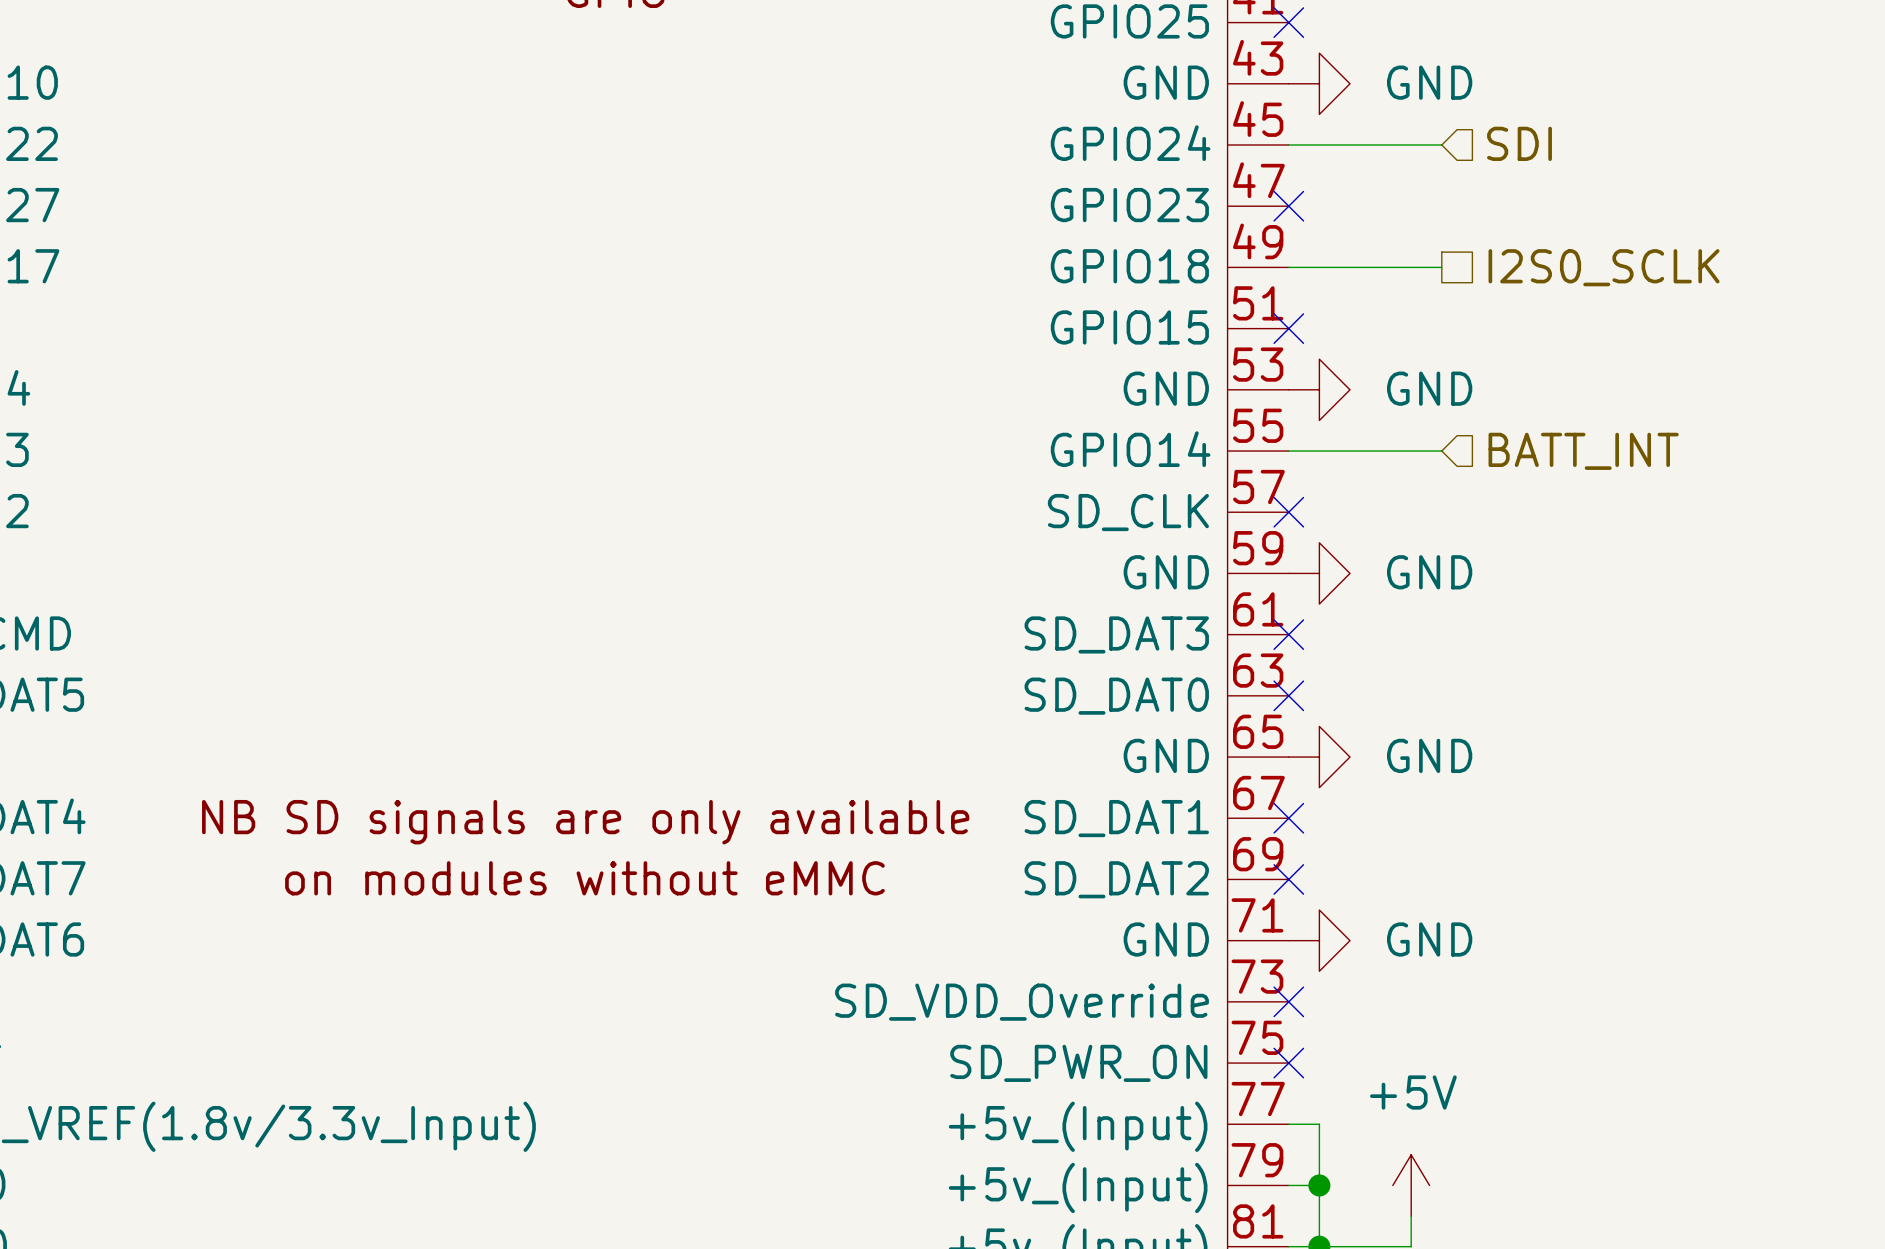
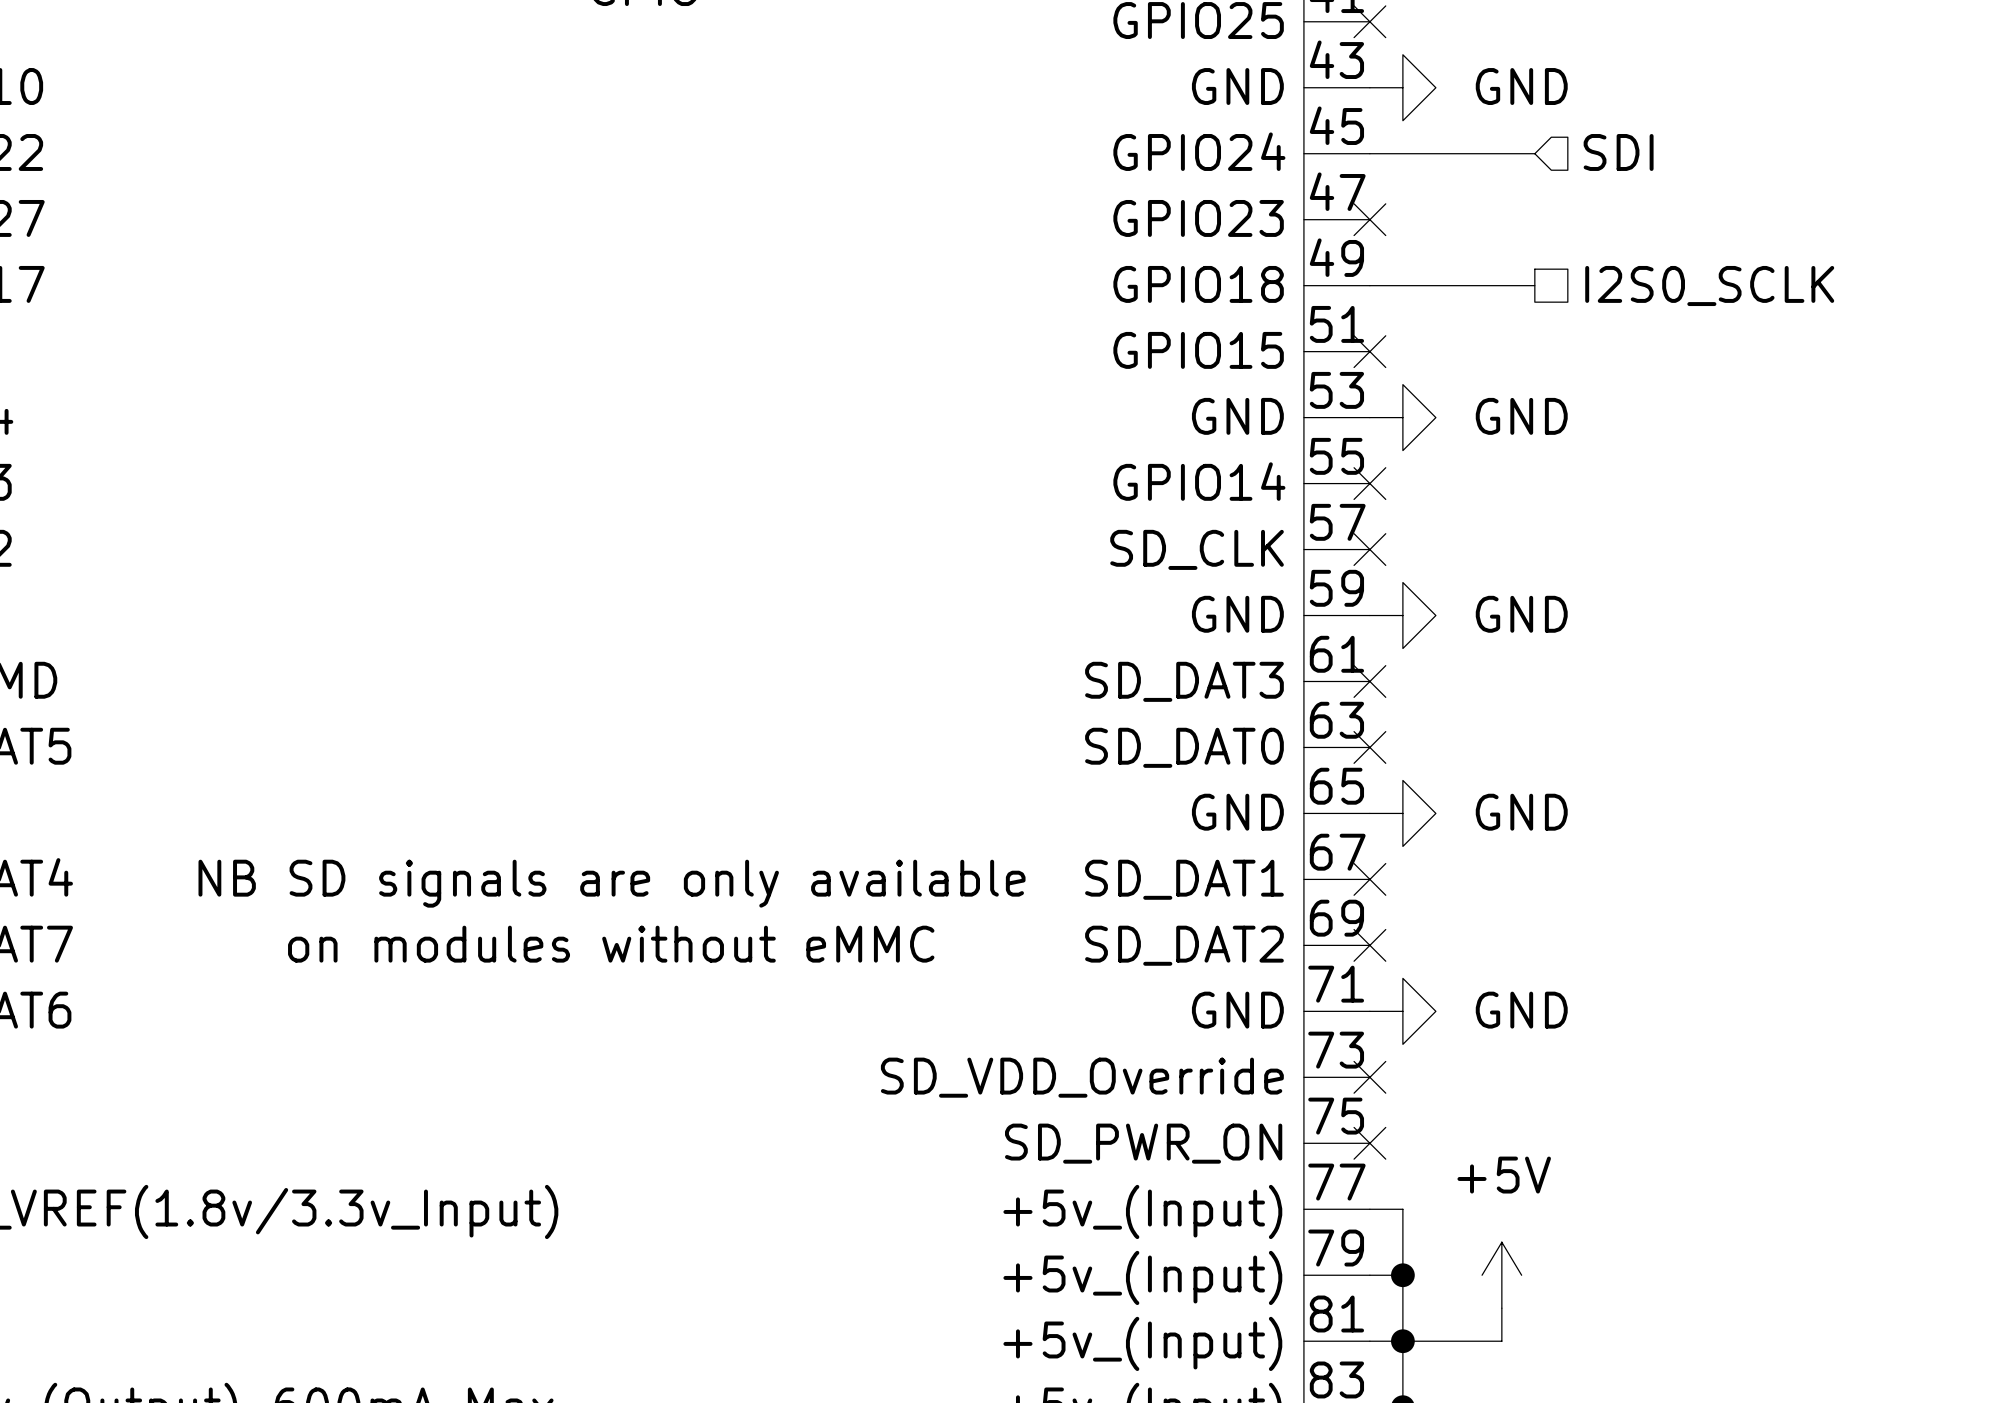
wire: (1288, 451) (1441, 451) -> none
no-connect mark: none -> (1369, 483)
hierarchical label: BATT_INT (1583, 451) -> none

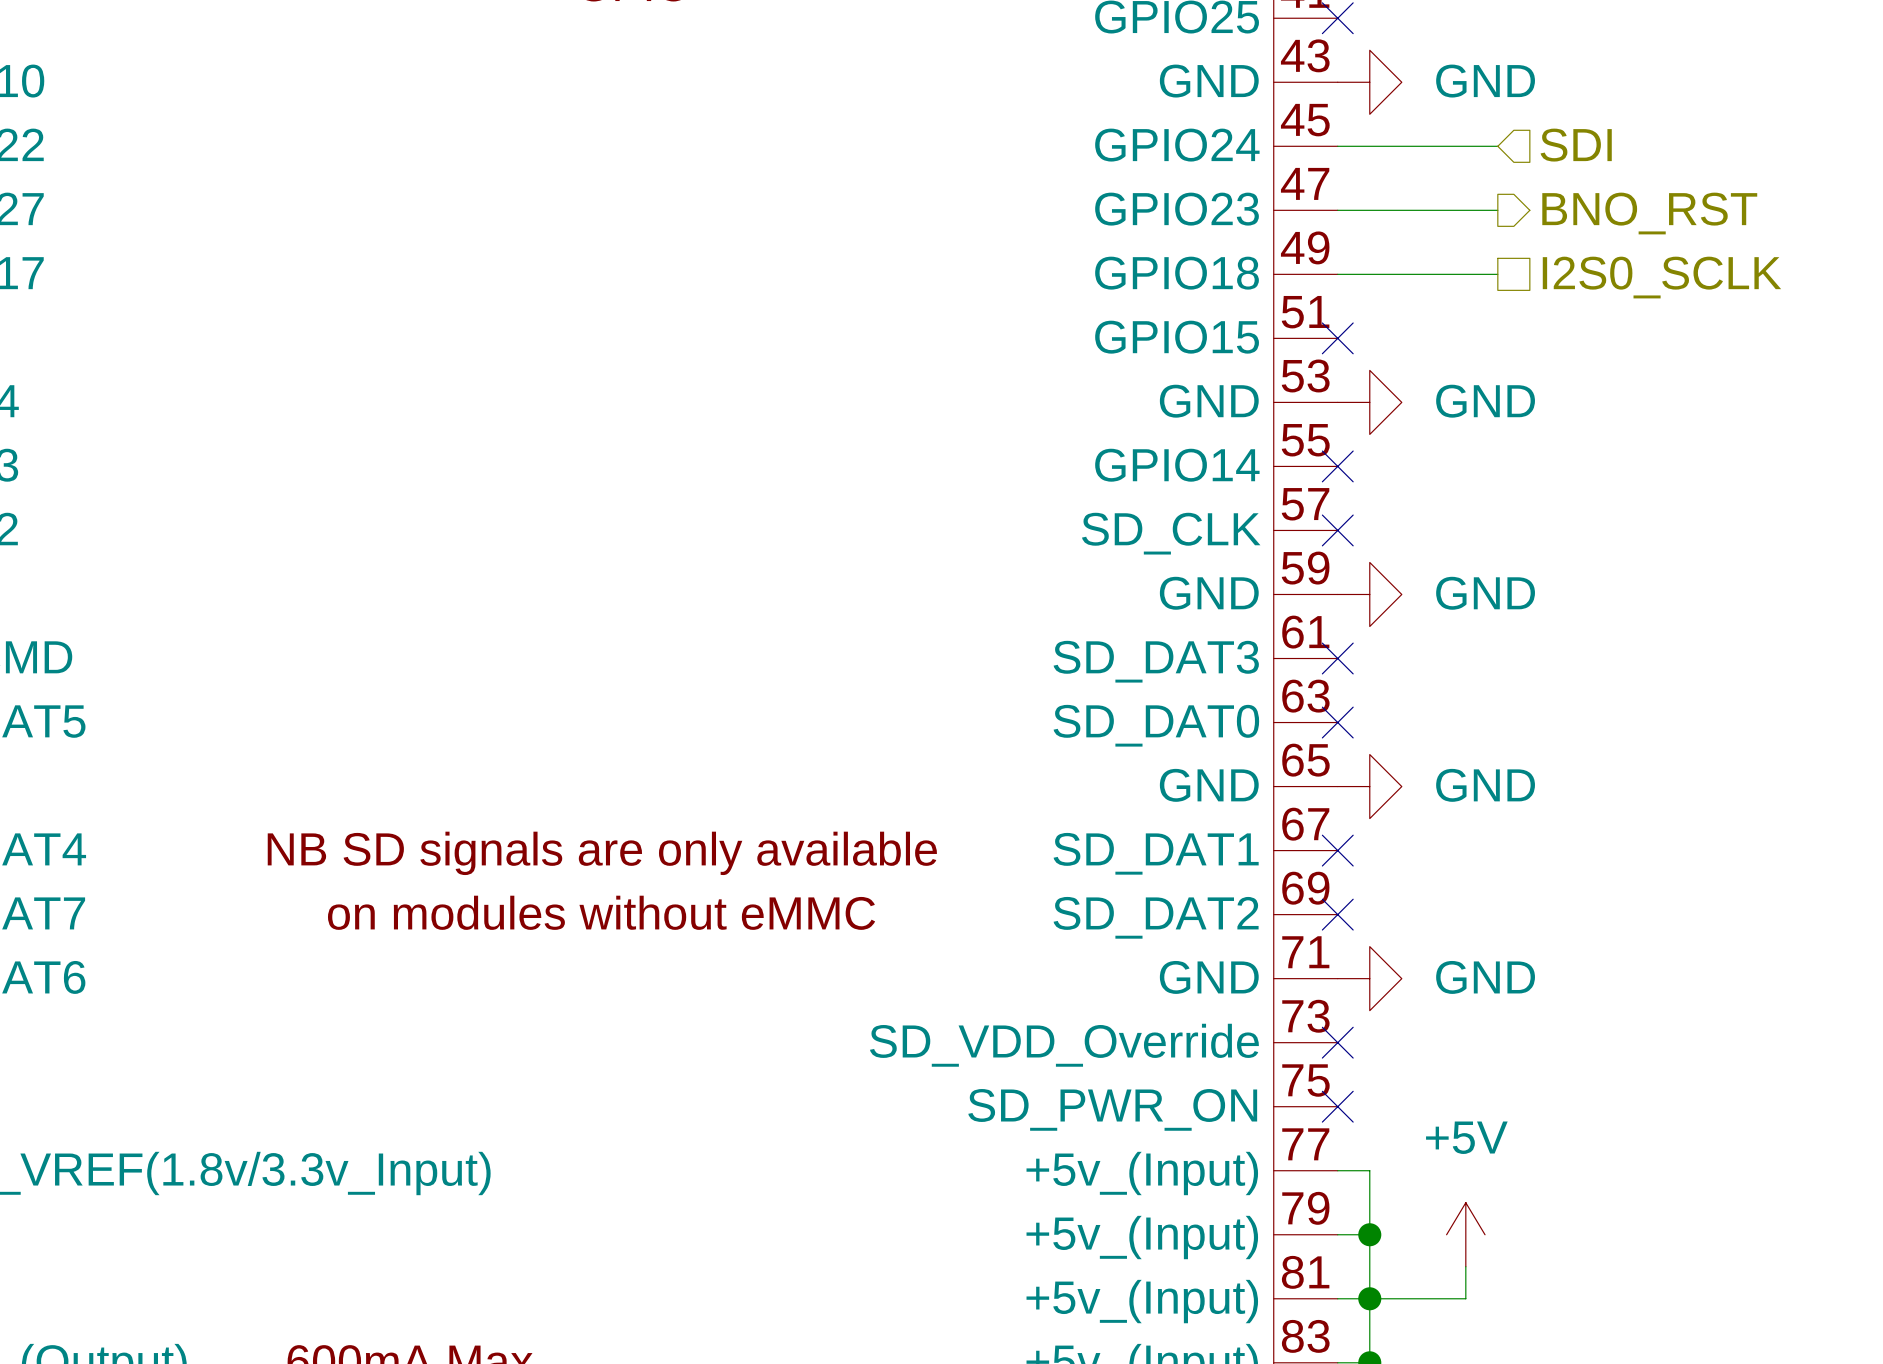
wire: none -> (1337, 210) (1497, 210)
no-connect mark: (1369, 219) -> none
hierarchical label: none -> BNO_RST (1649, 213)

